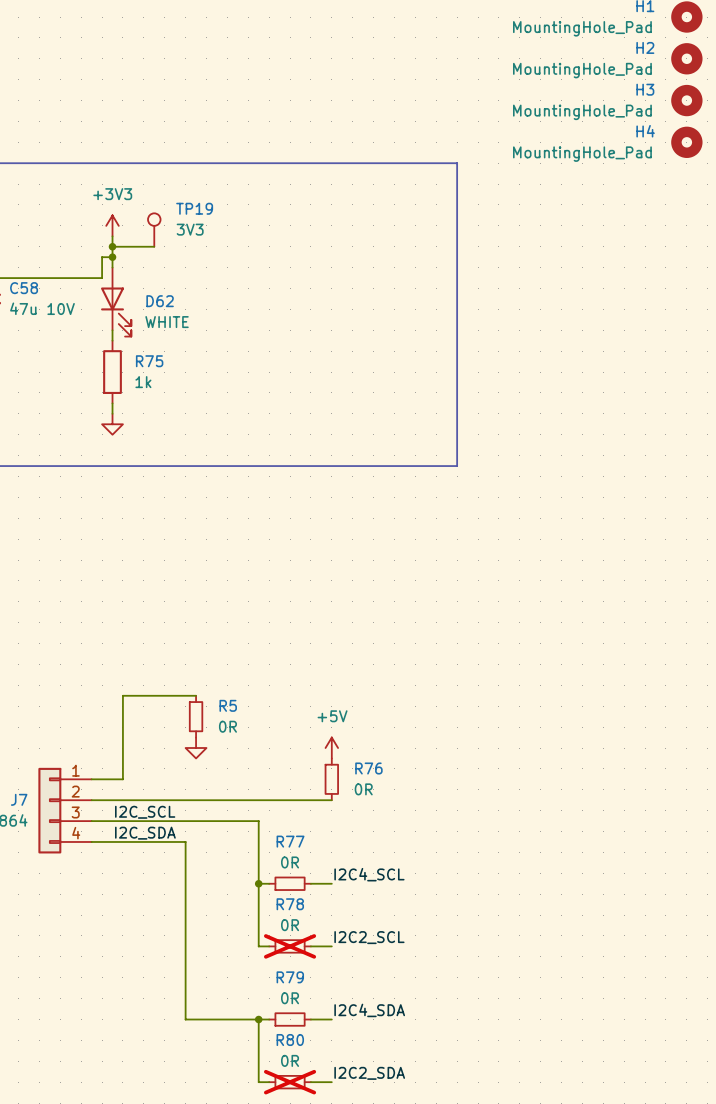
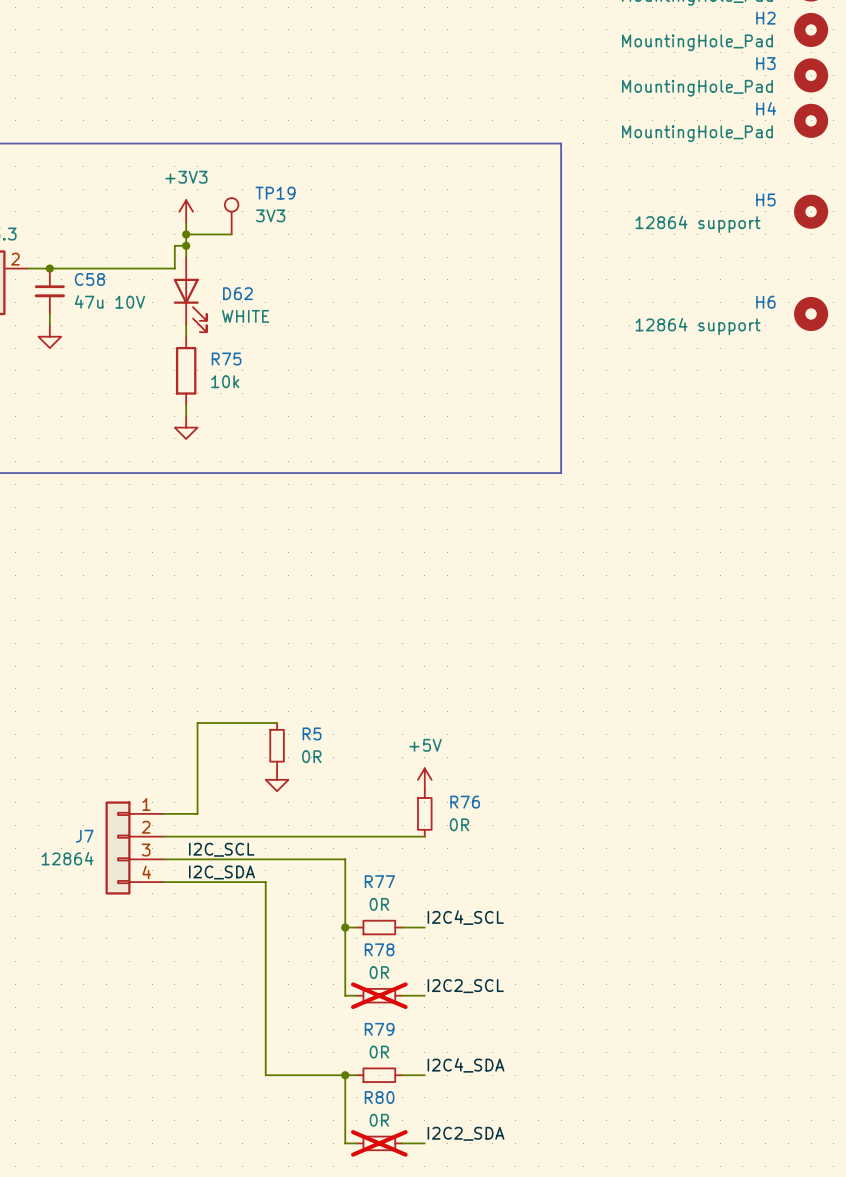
H5: none -> 12864 support (811, 211)
H6: none -> 12864 support (811, 313)
R75 value: 1k (143, 382) -> 10k (225, 381)

